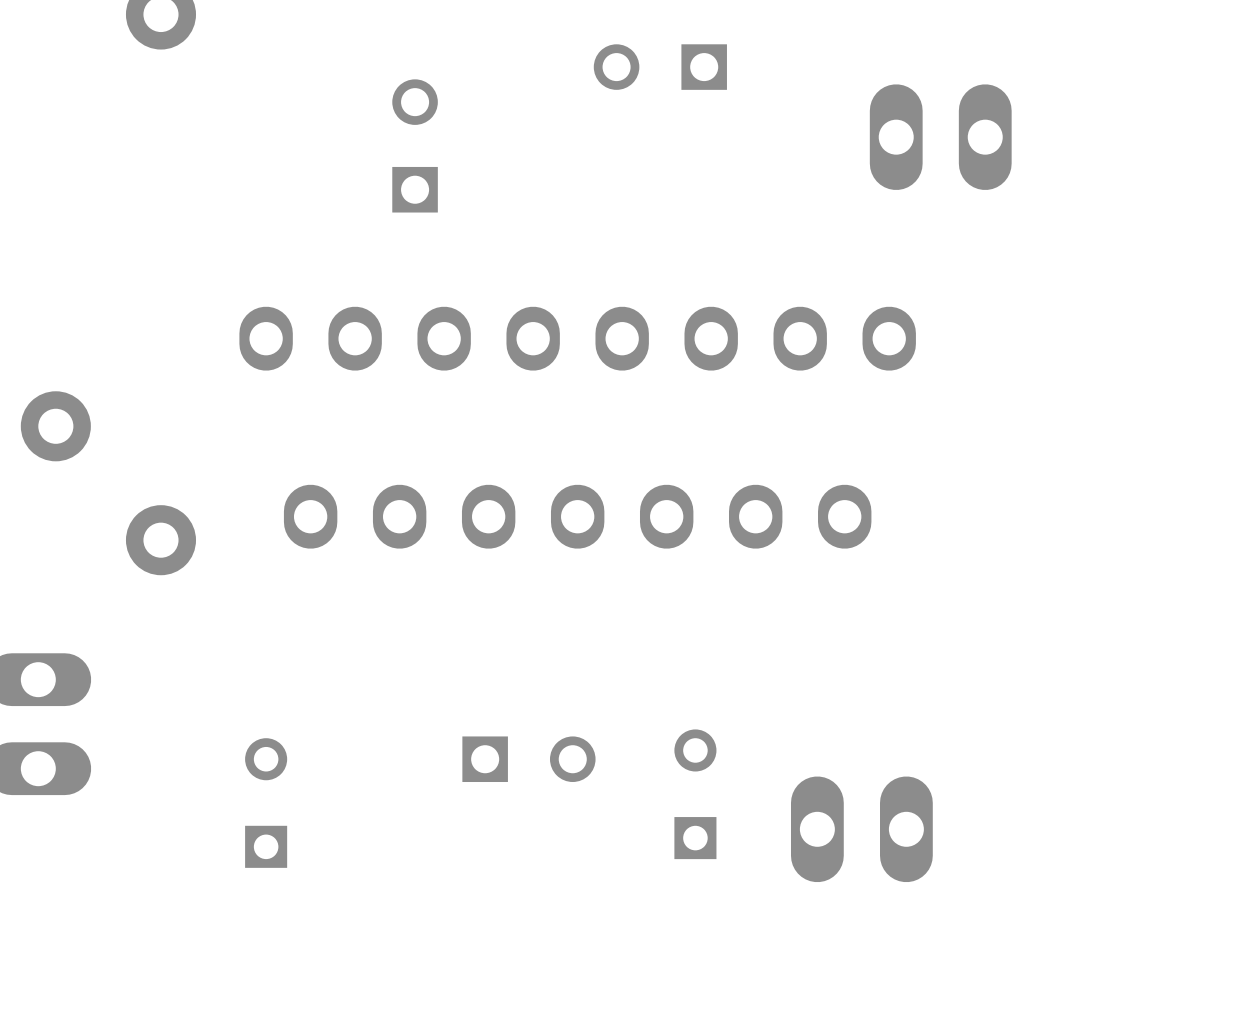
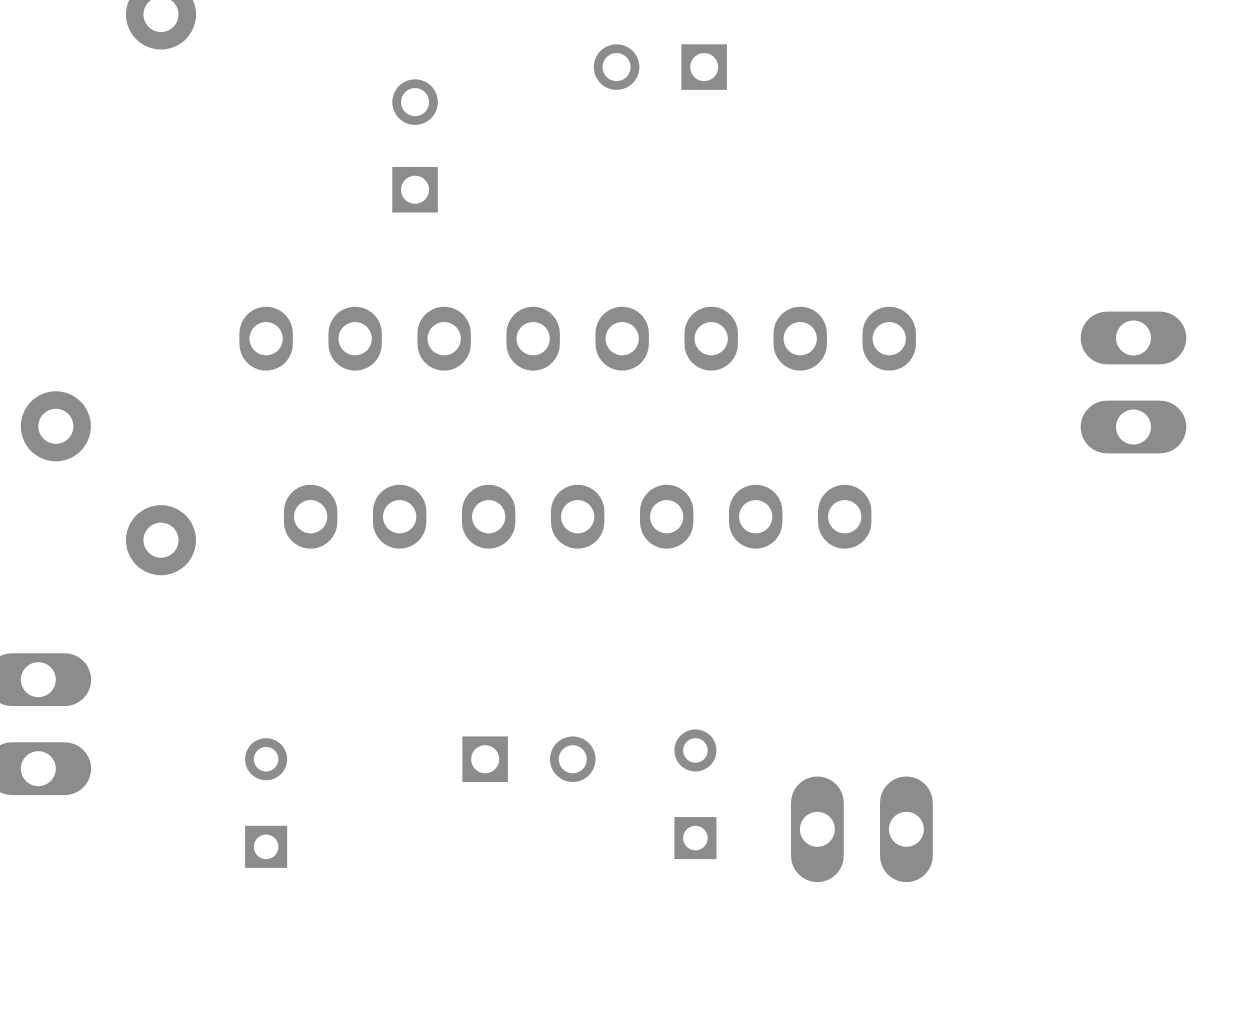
part rotation: 0° (940, 137) -> 90° clockwise (1133, 382)
part position: (940, 137) -> (1133, 382)

